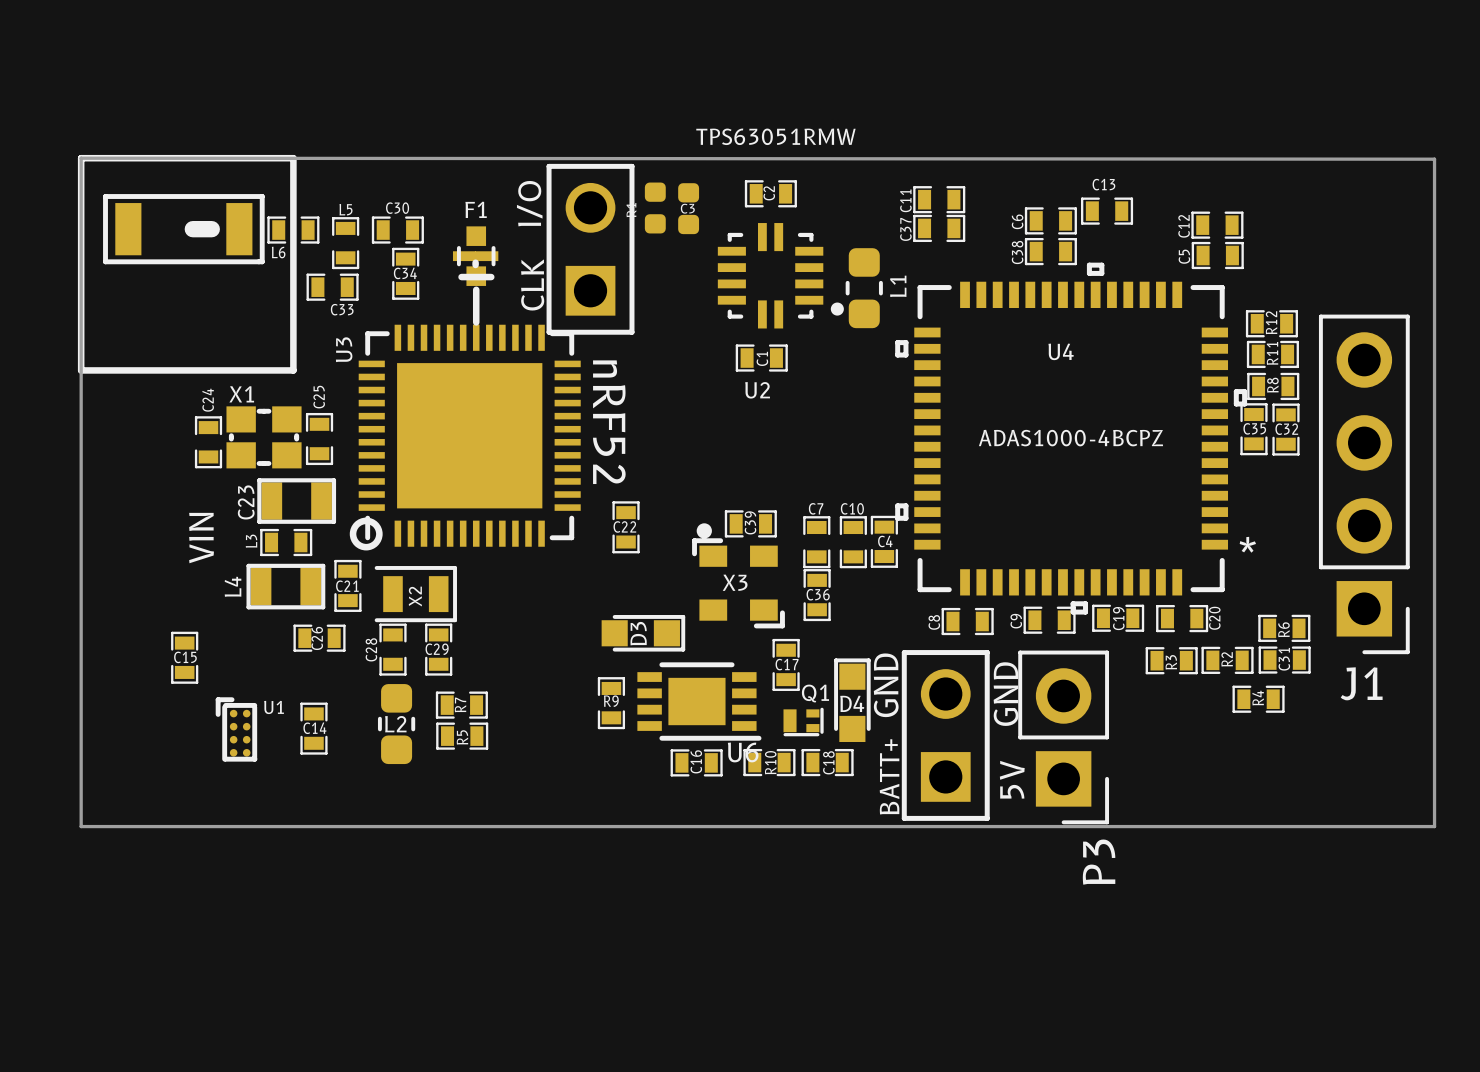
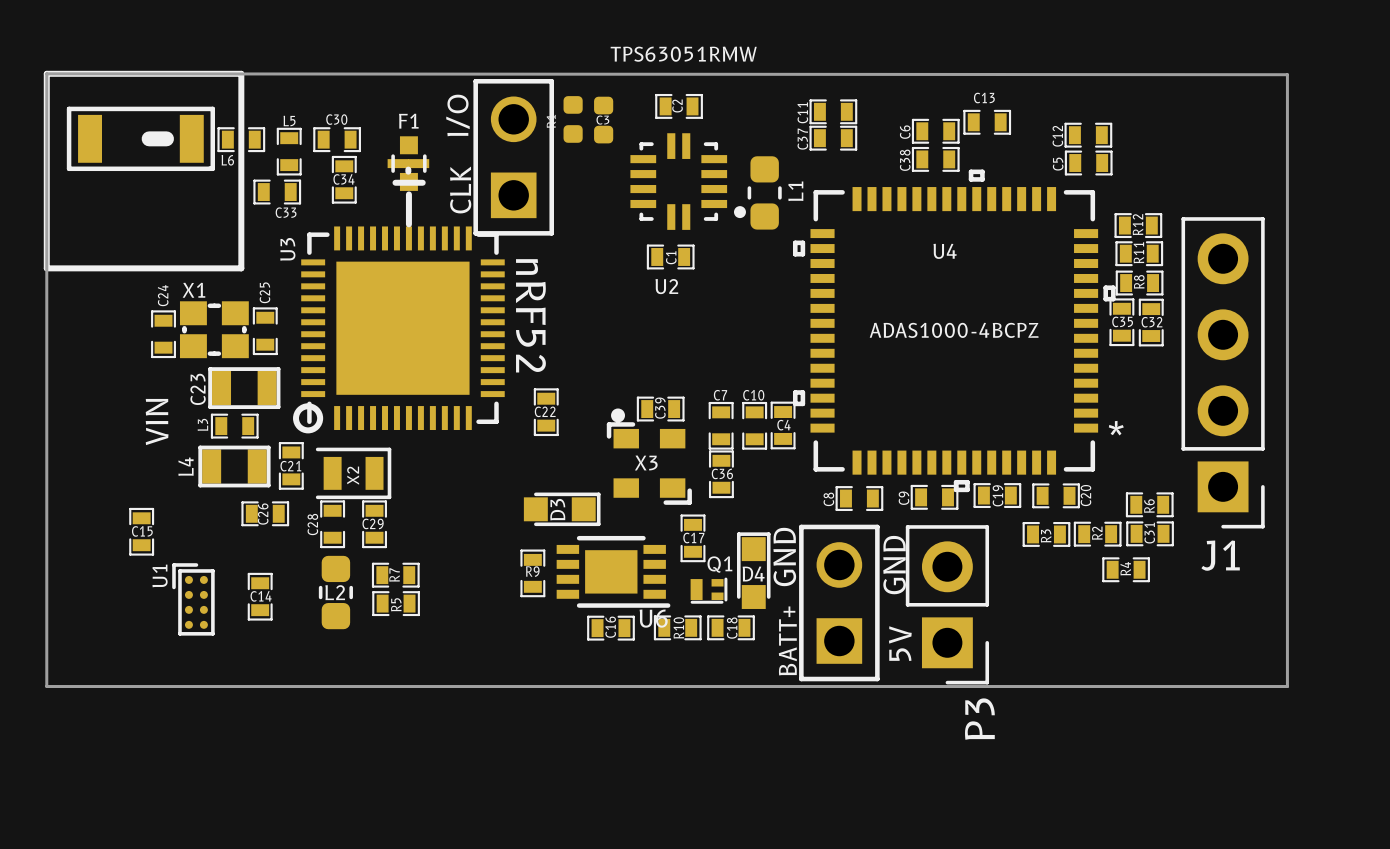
U1 footprint: [215, 697, 258, 762] -> [172, 563, 215, 636]
U1 name rotation: 0° (274, 707) -> 90° counterclockwise (160, 575)
U1 name position: U1 (274, 707) -> U1 (160, 575)

